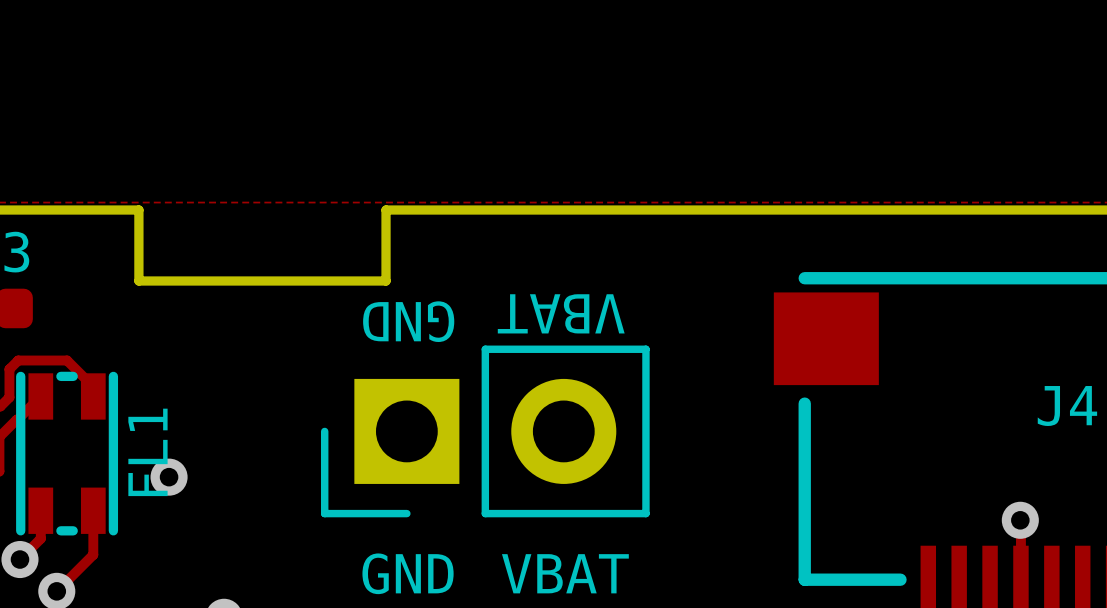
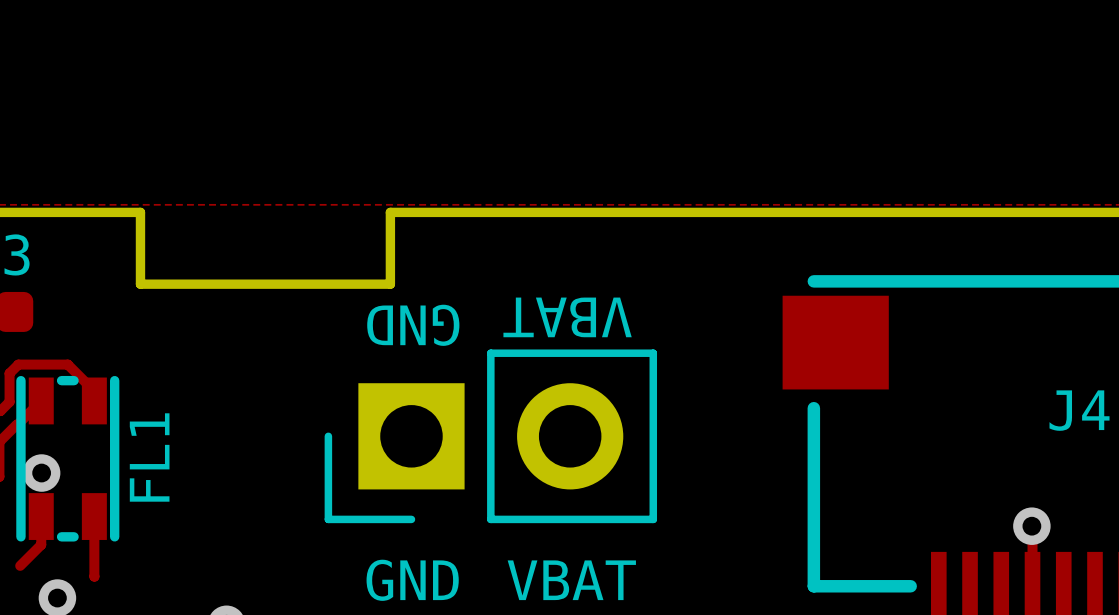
via: none -> (41, 473)
via: (169, 477) -> none
track: (93, 554) (56, 591) -> (94, 561) (94, 576)
via: (19, 559) -> none

